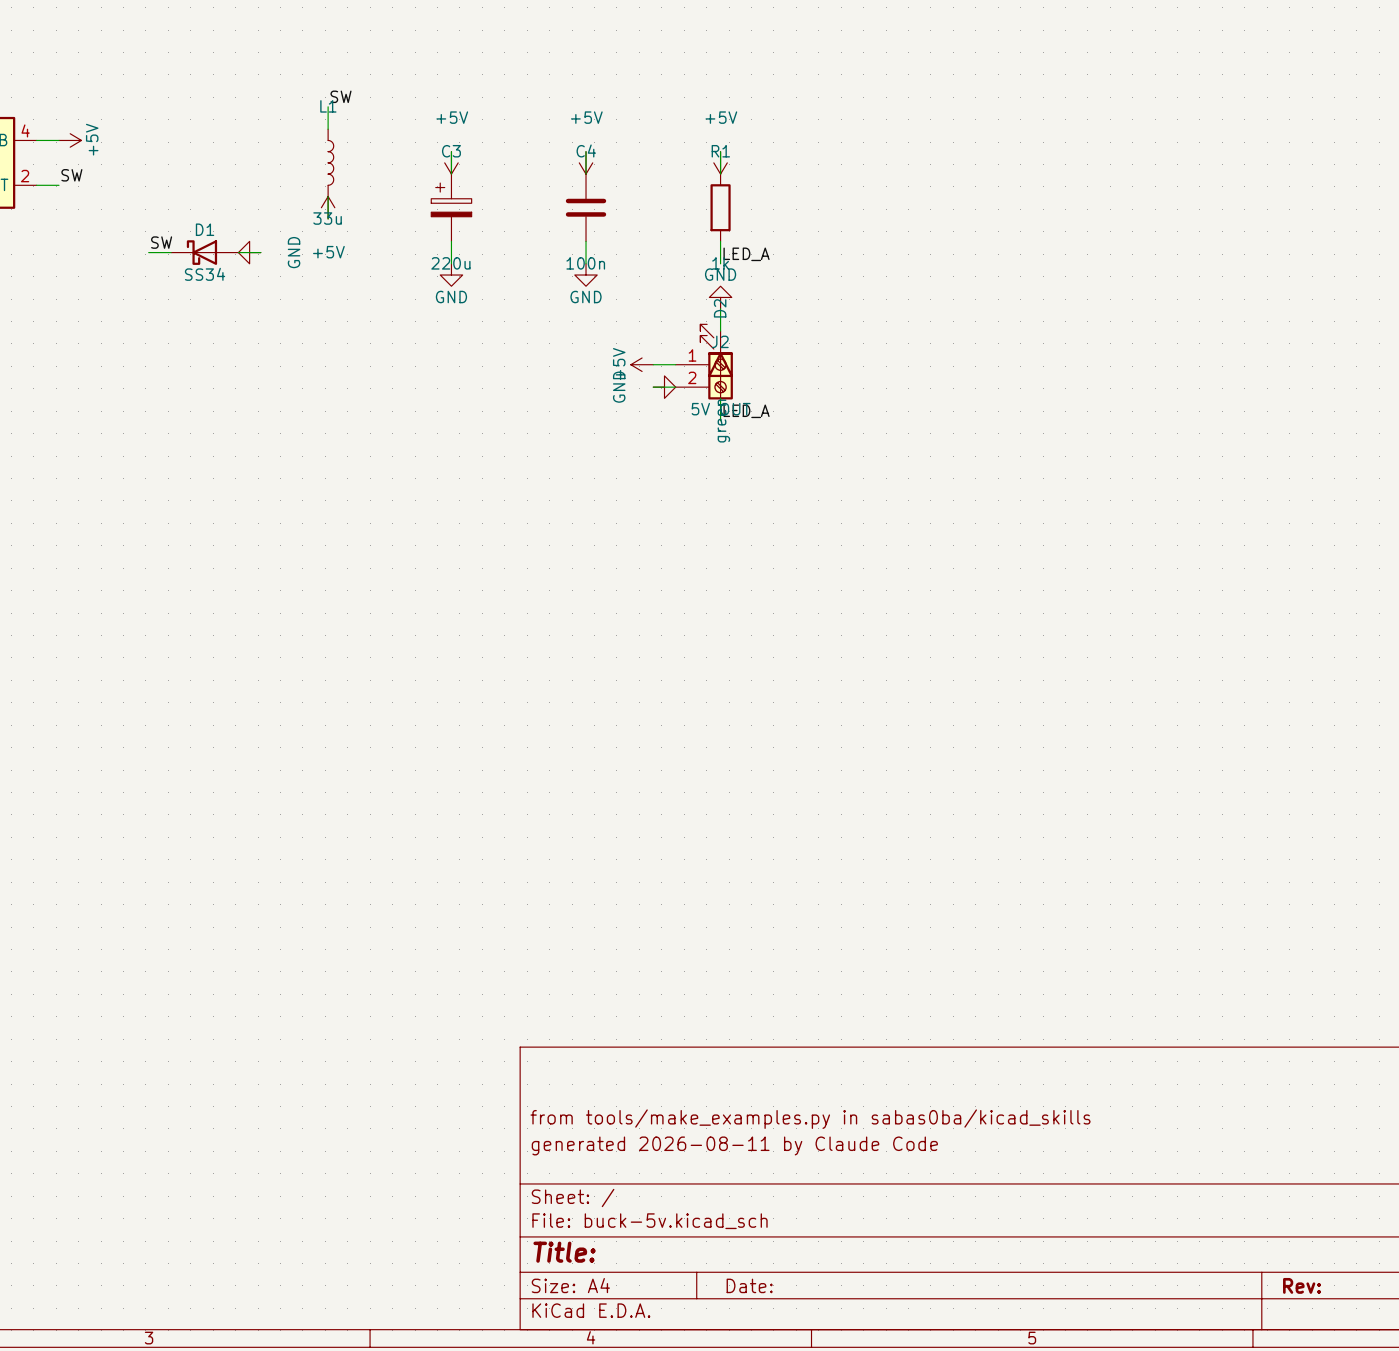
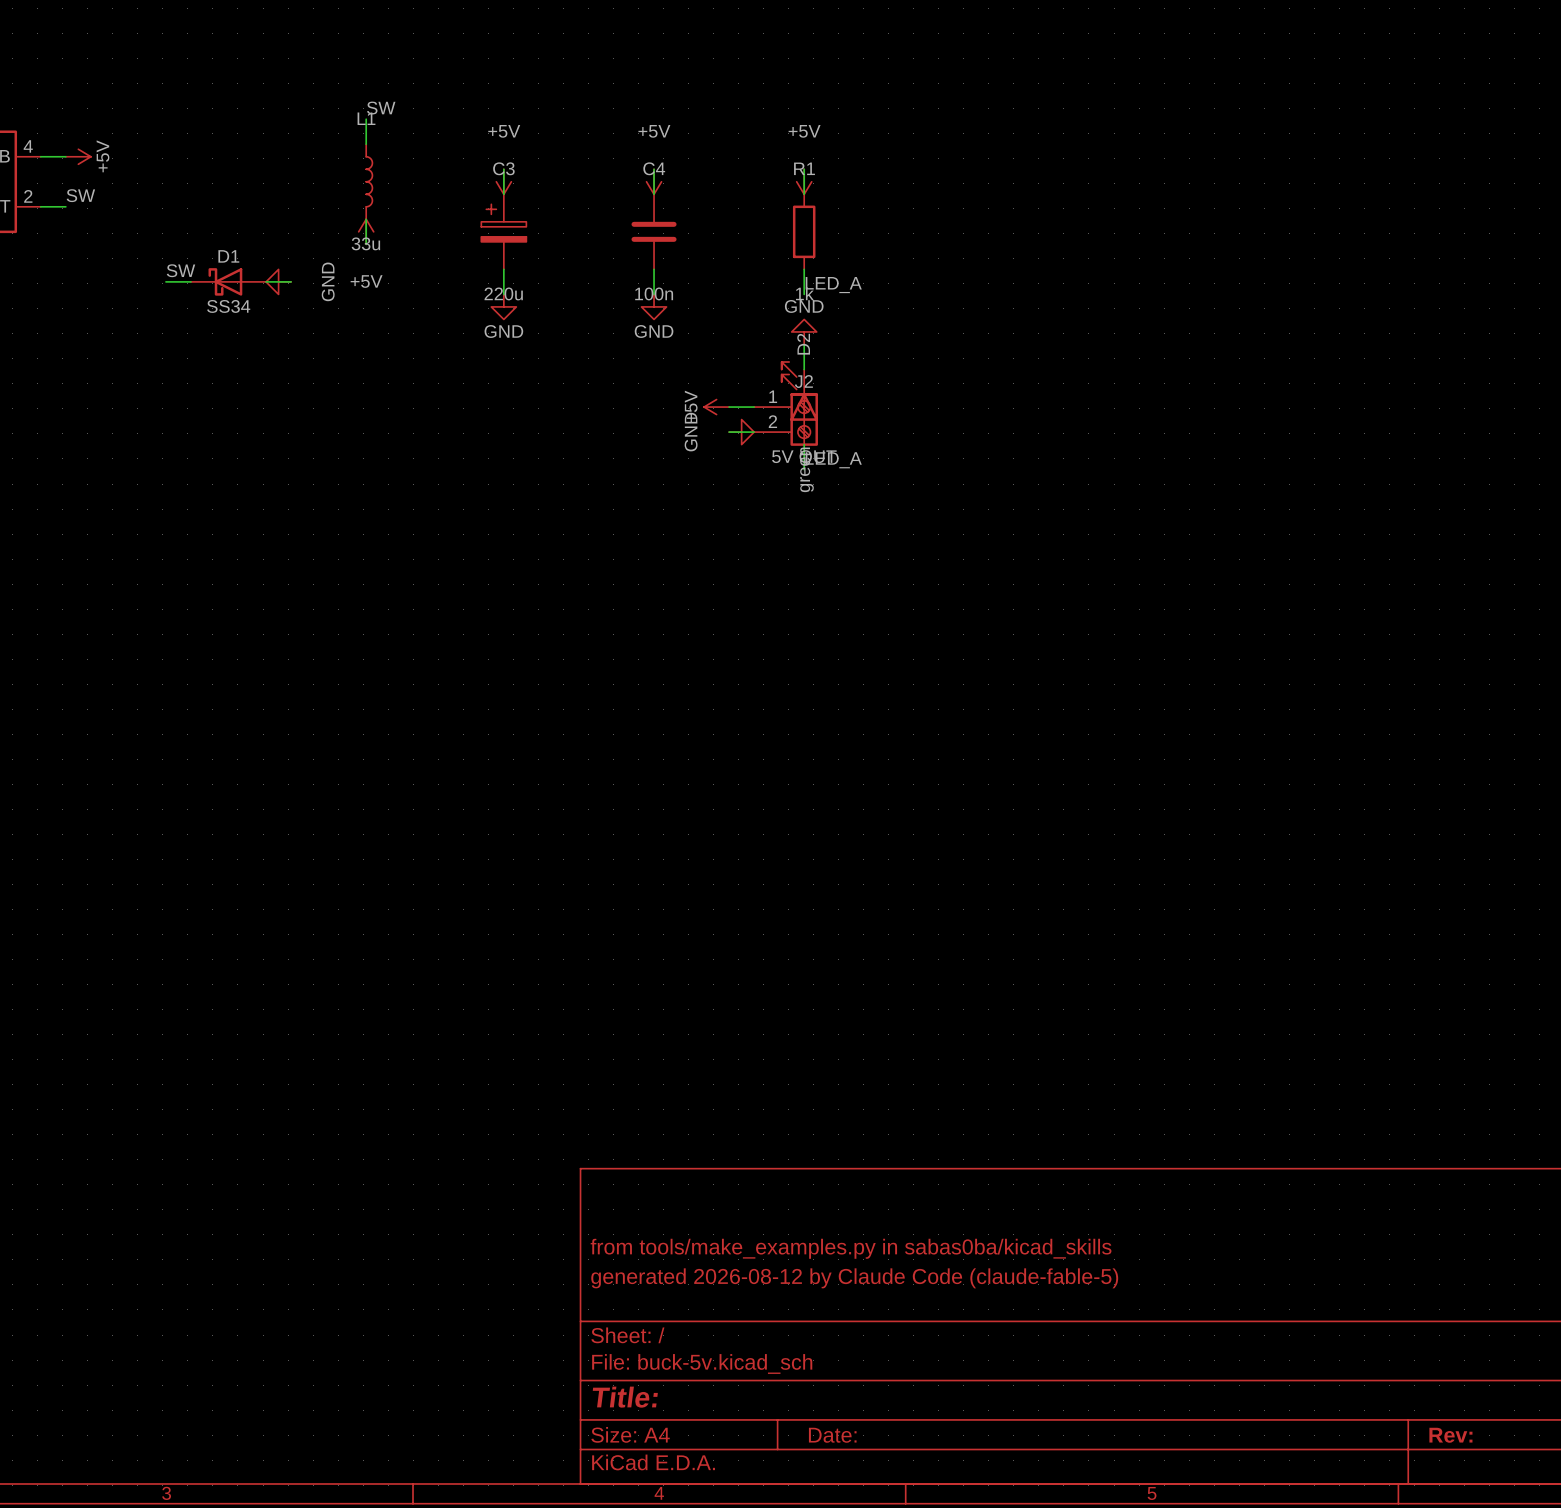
title block: generated 2026-08-11 by Claude Code (734, 1145) -> generated 2026-08-12 by Claude Code (claude-fable-5) (854, 1278)

